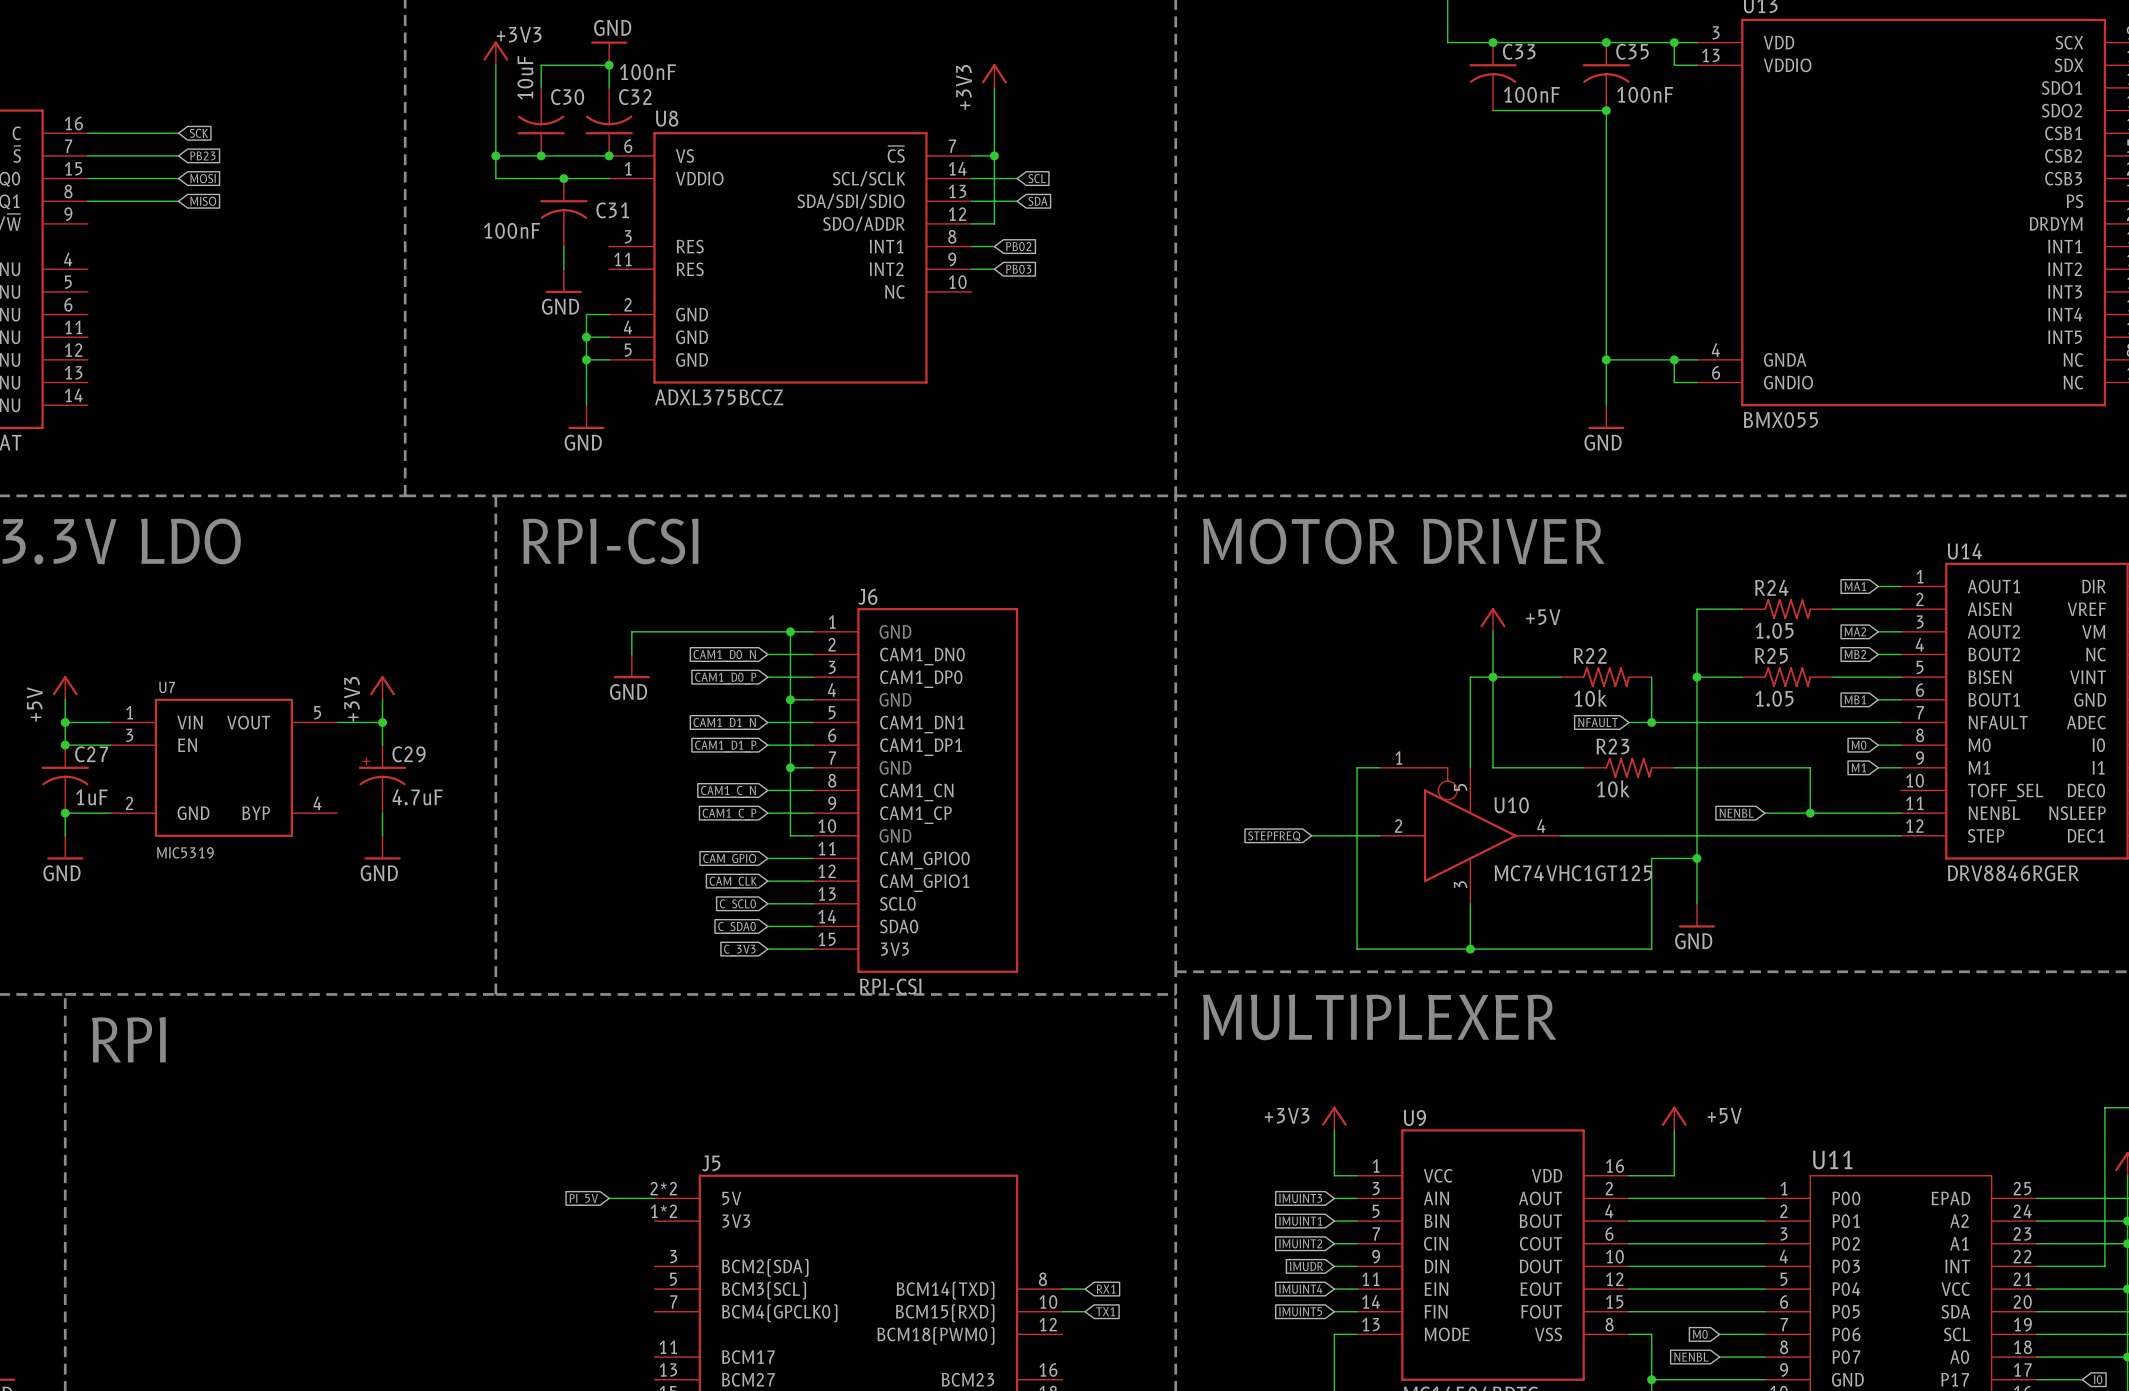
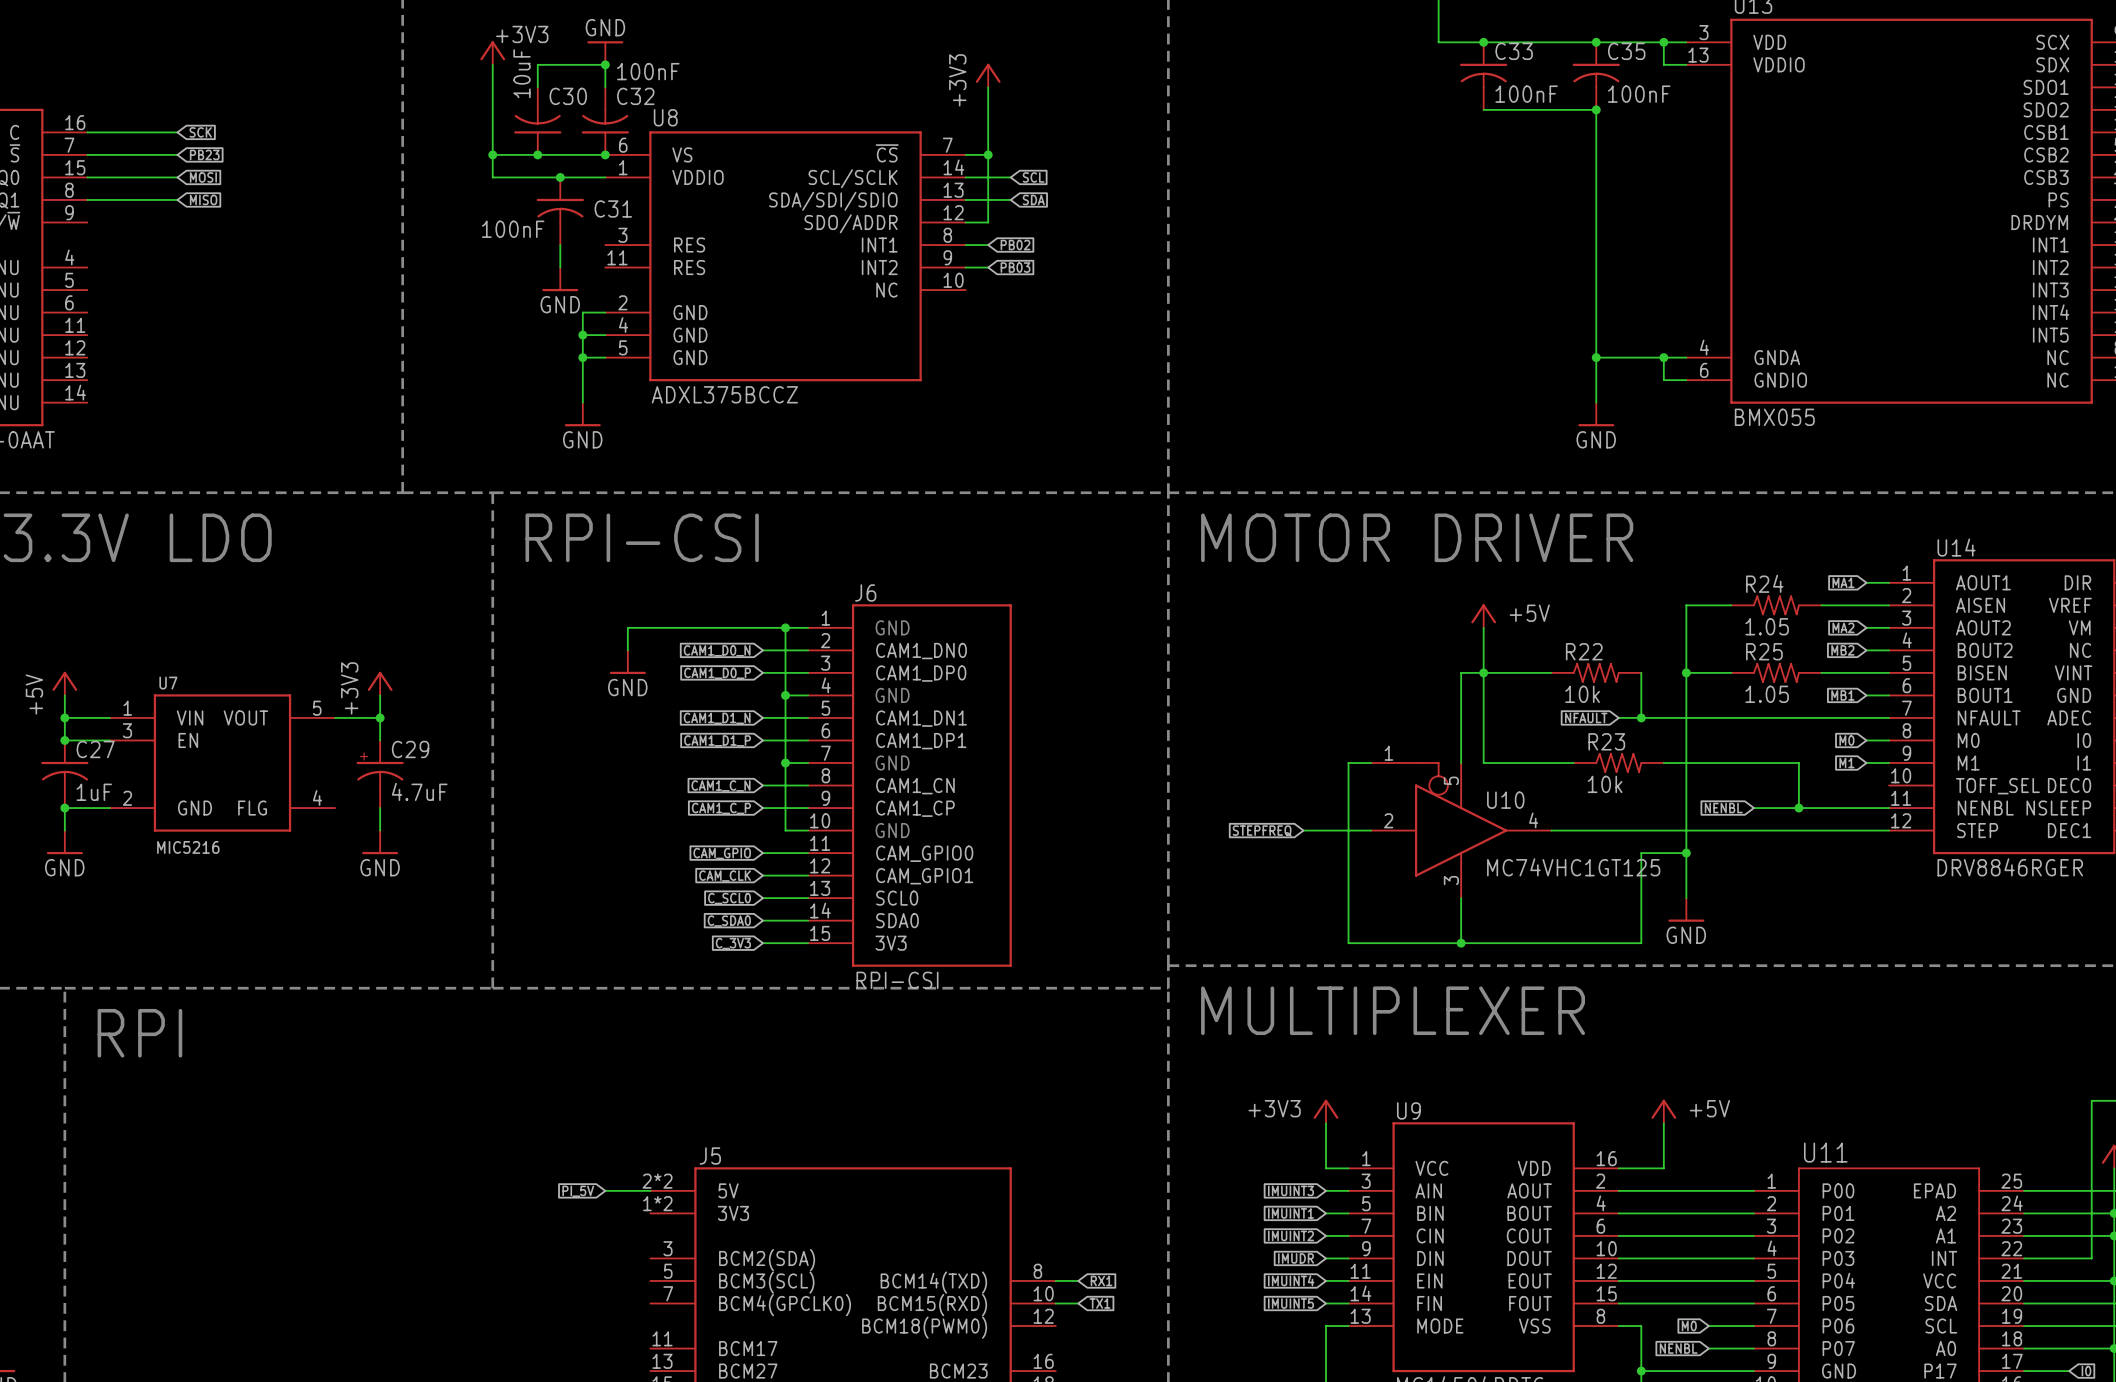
U7 pin name: BYP (256, 813) -> FLG (252, 808)
U7 value: MIC5319 (185, 852) -> MIC5216 (188, 847)

